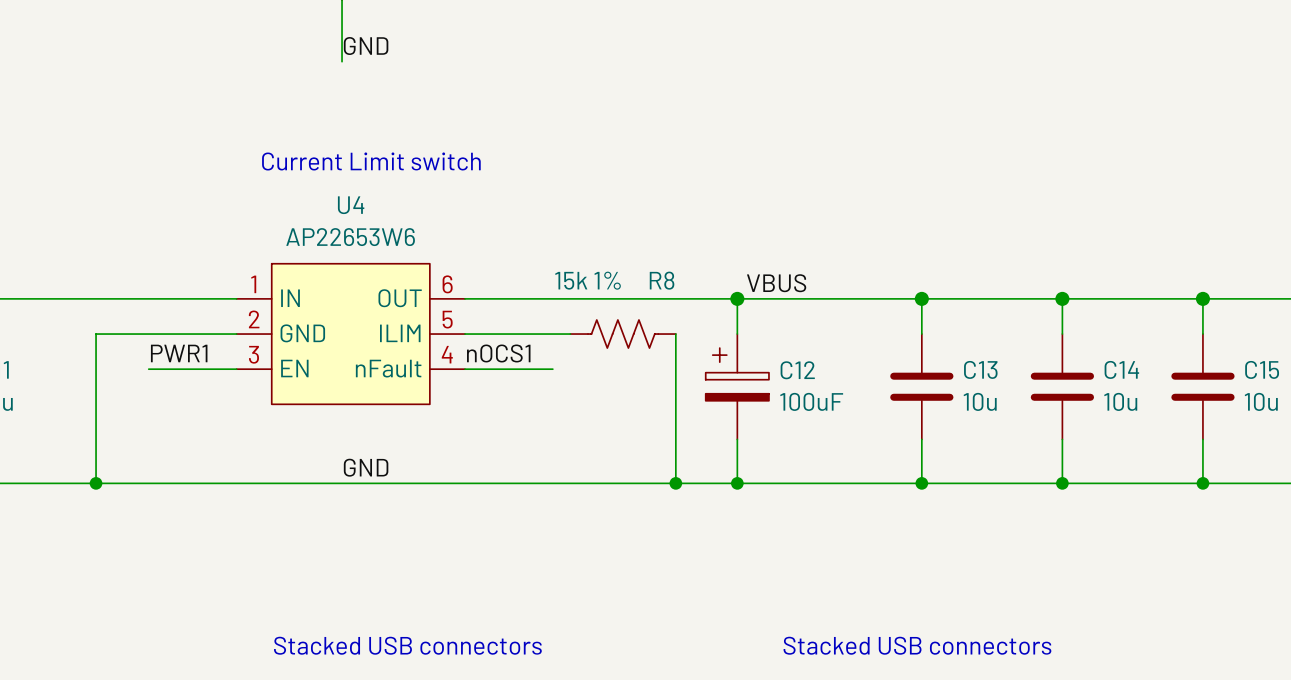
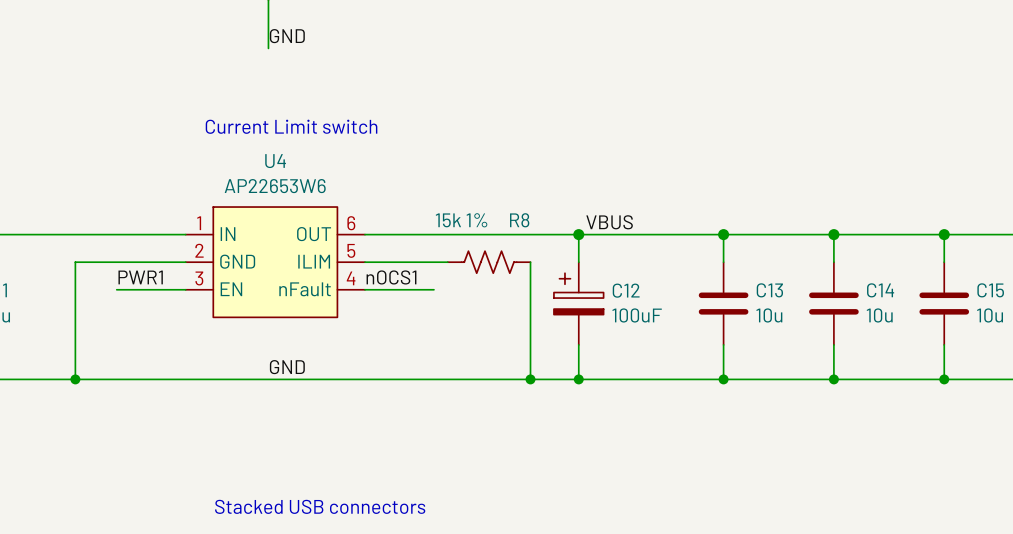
text: Stacked USB connectors (917, 645) -> none

